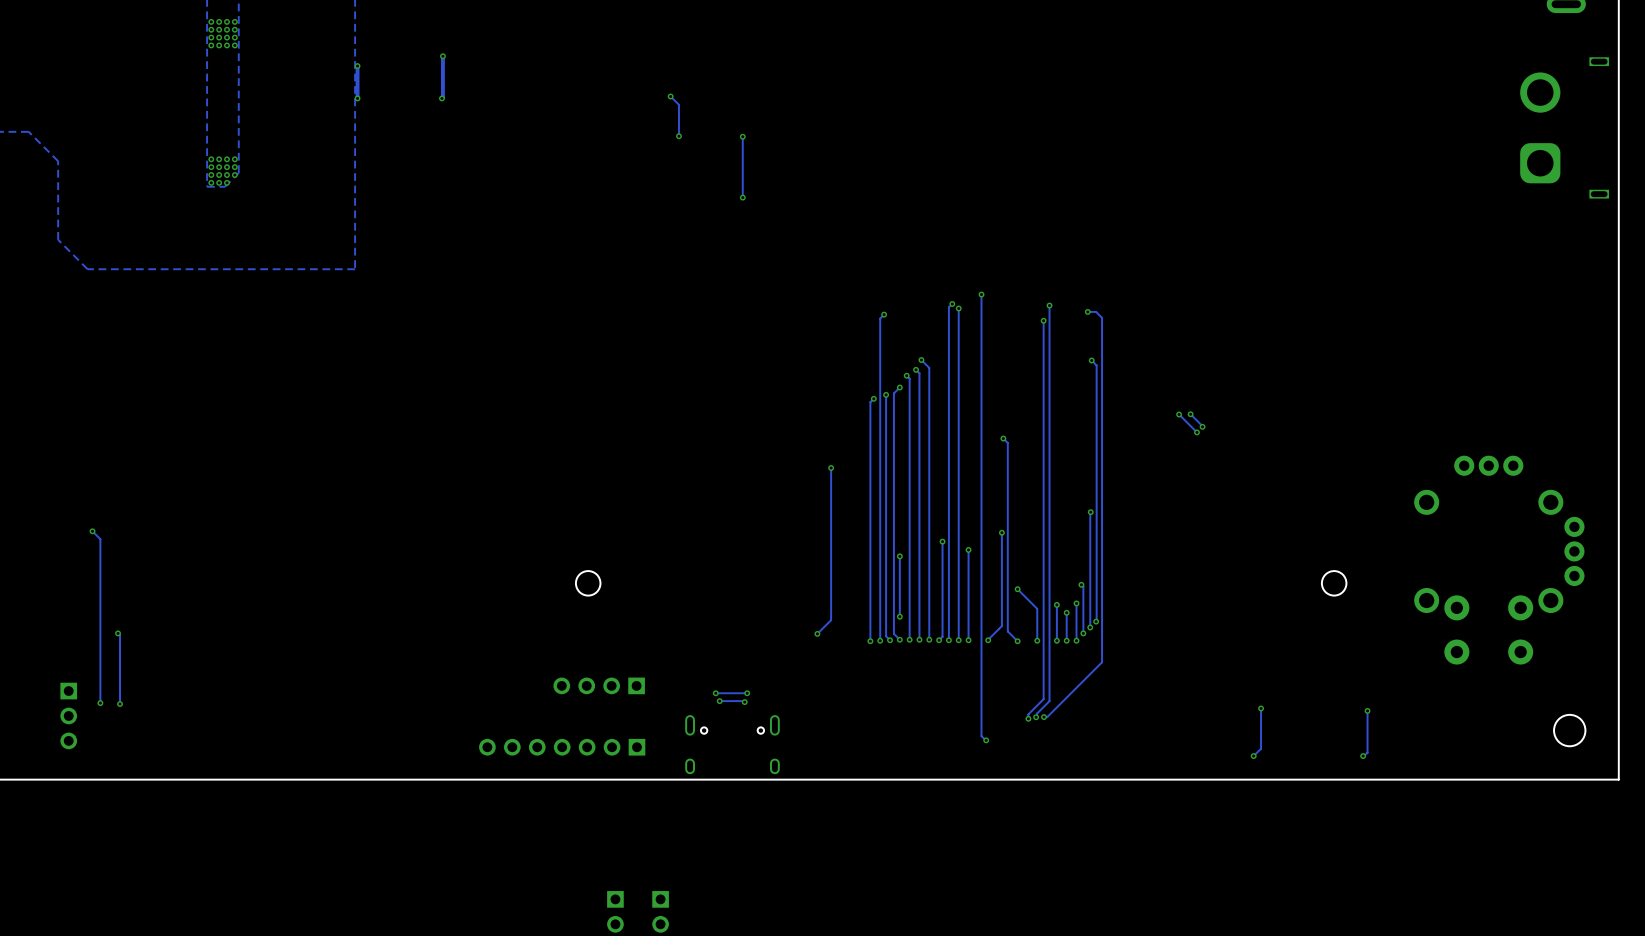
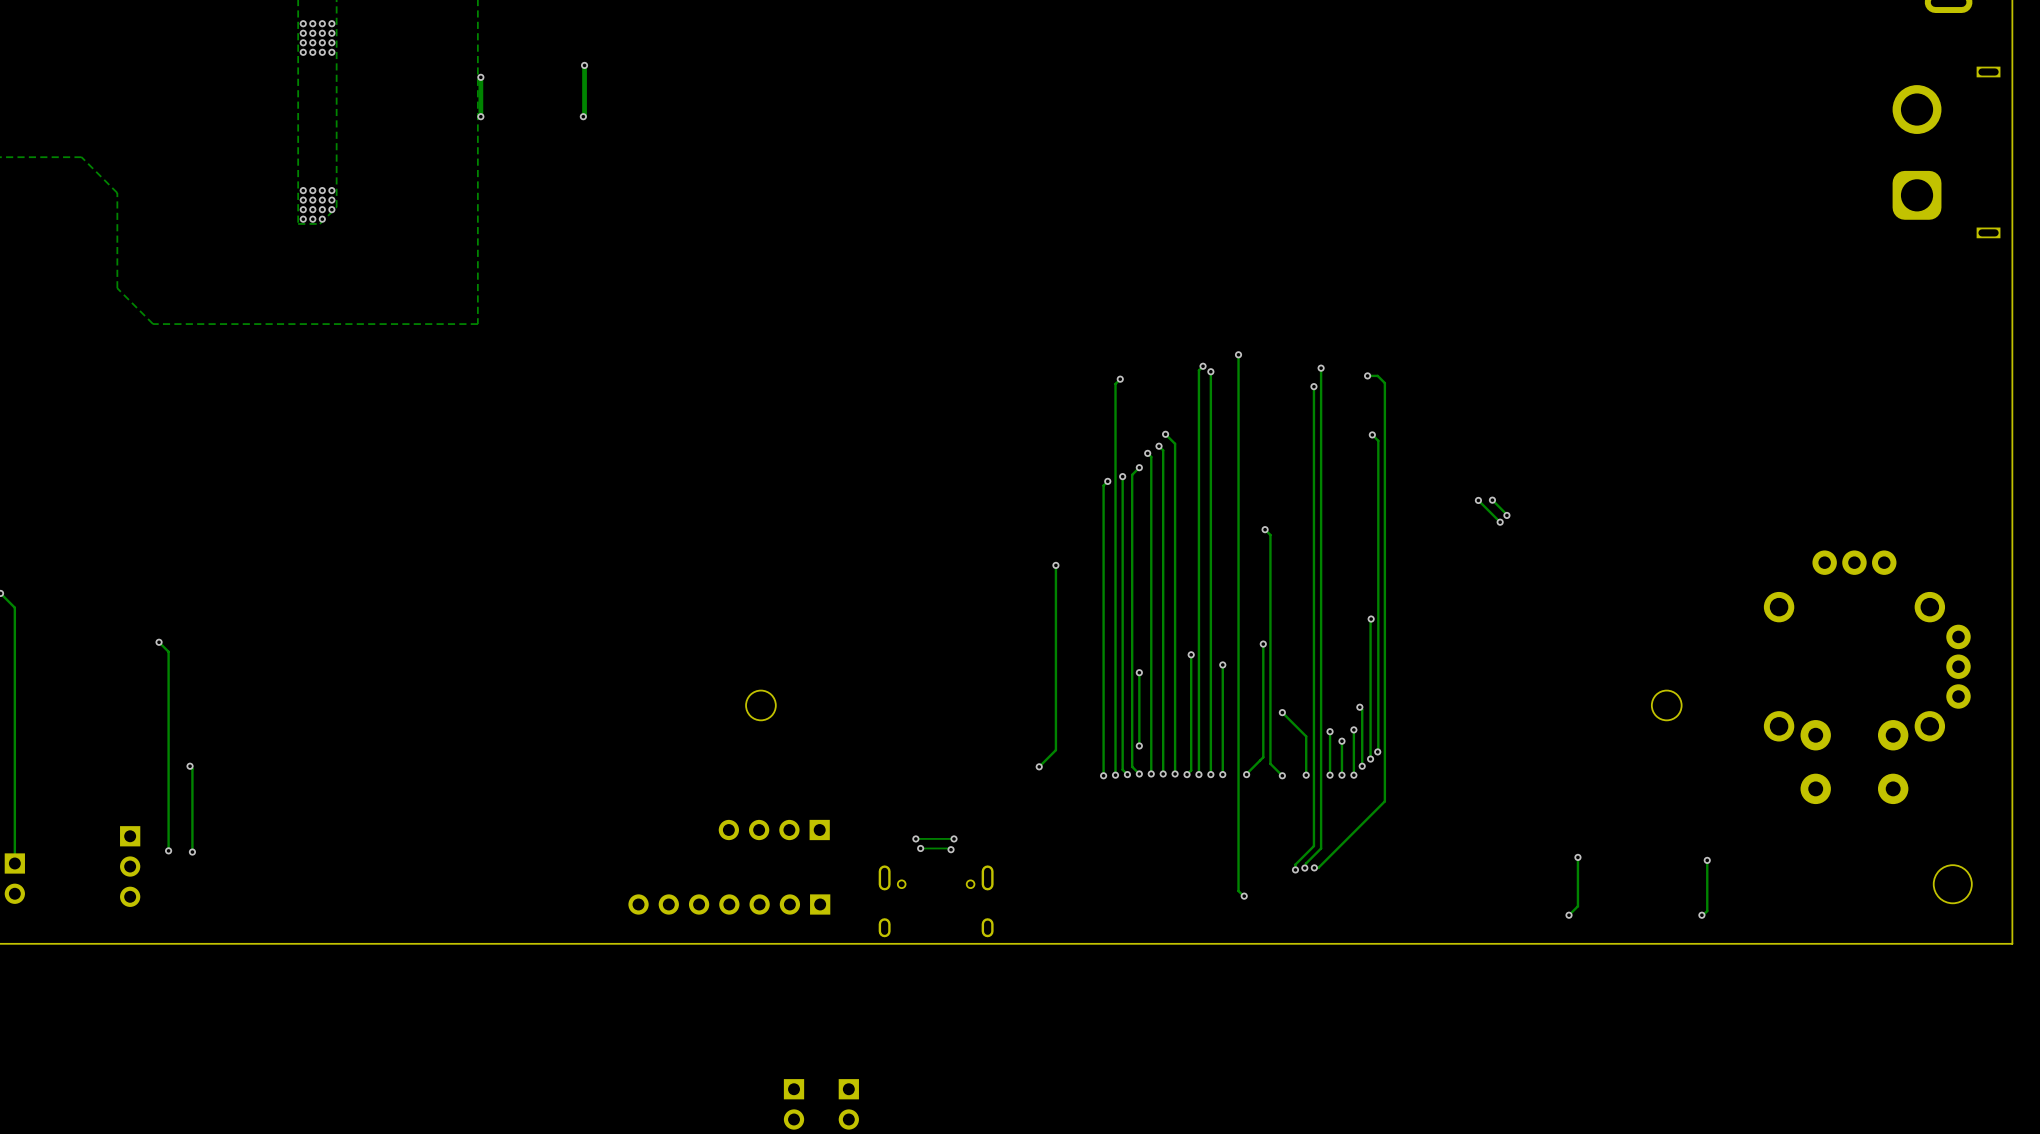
track: (670, 96) (678, 104) (678, 136) -> none
via: (670, 96) -> none
via: (678, 136) -> none
track: (742, 136) (742, 197) -> none
via: (742, 136) -> none
via: (742, 197) -> none

